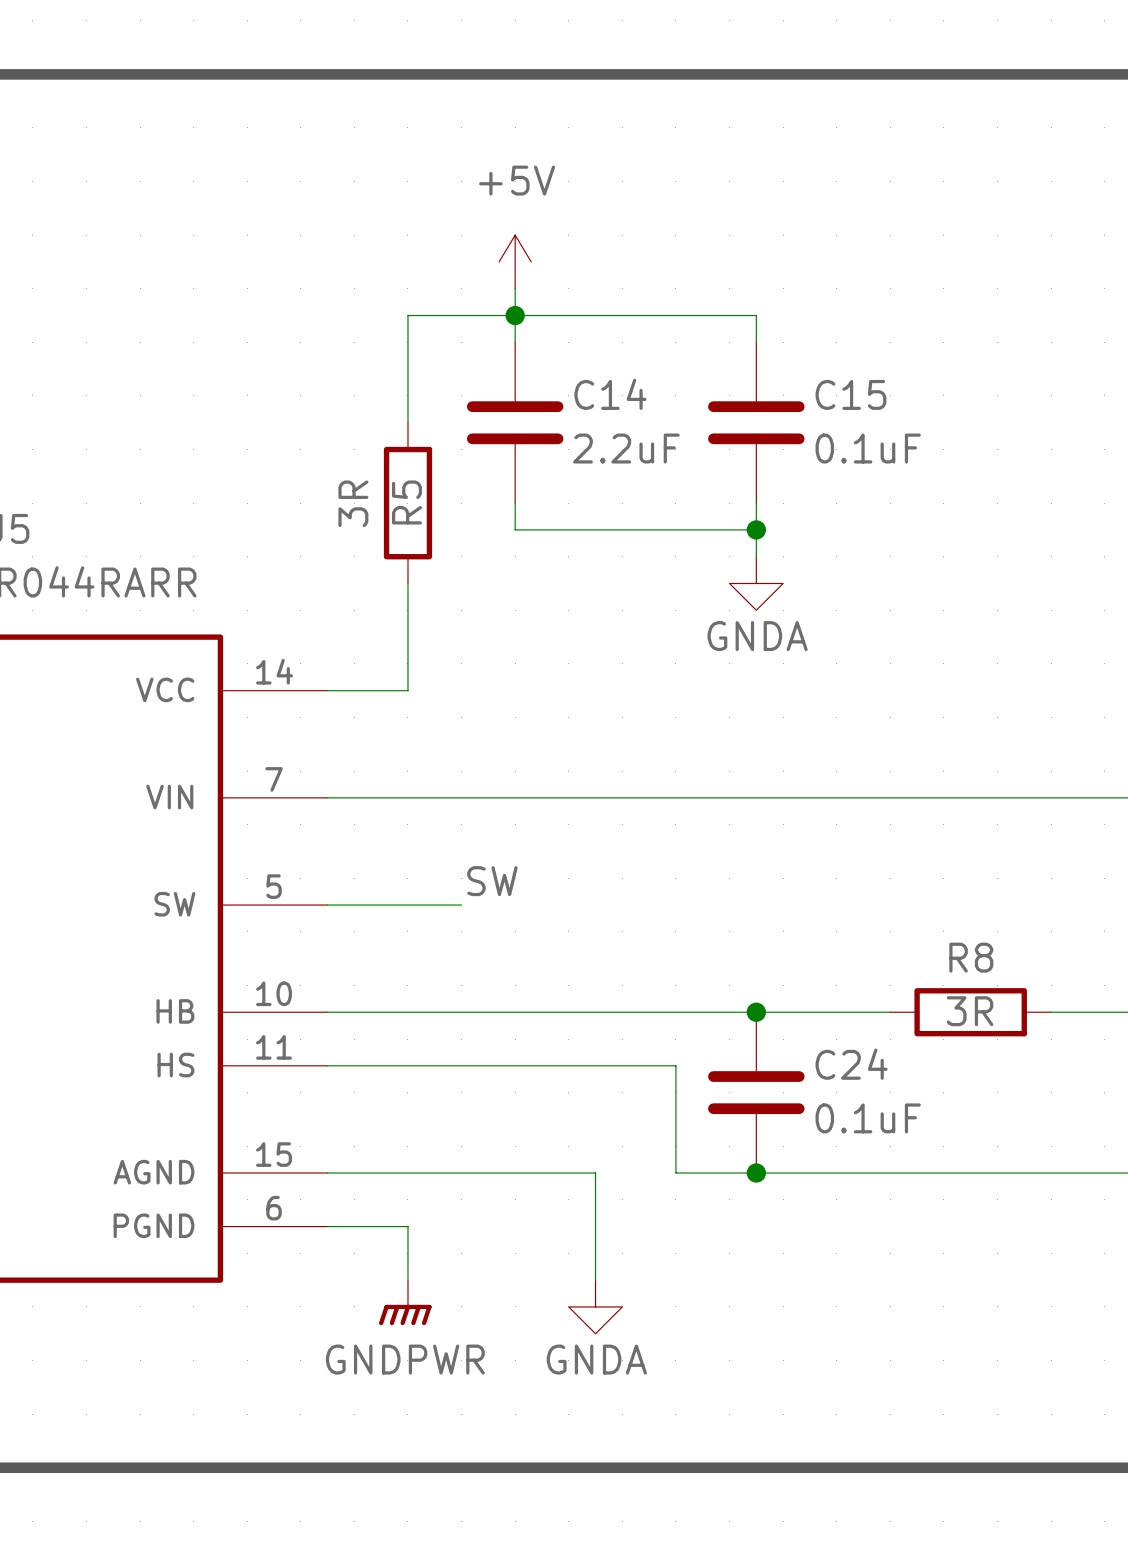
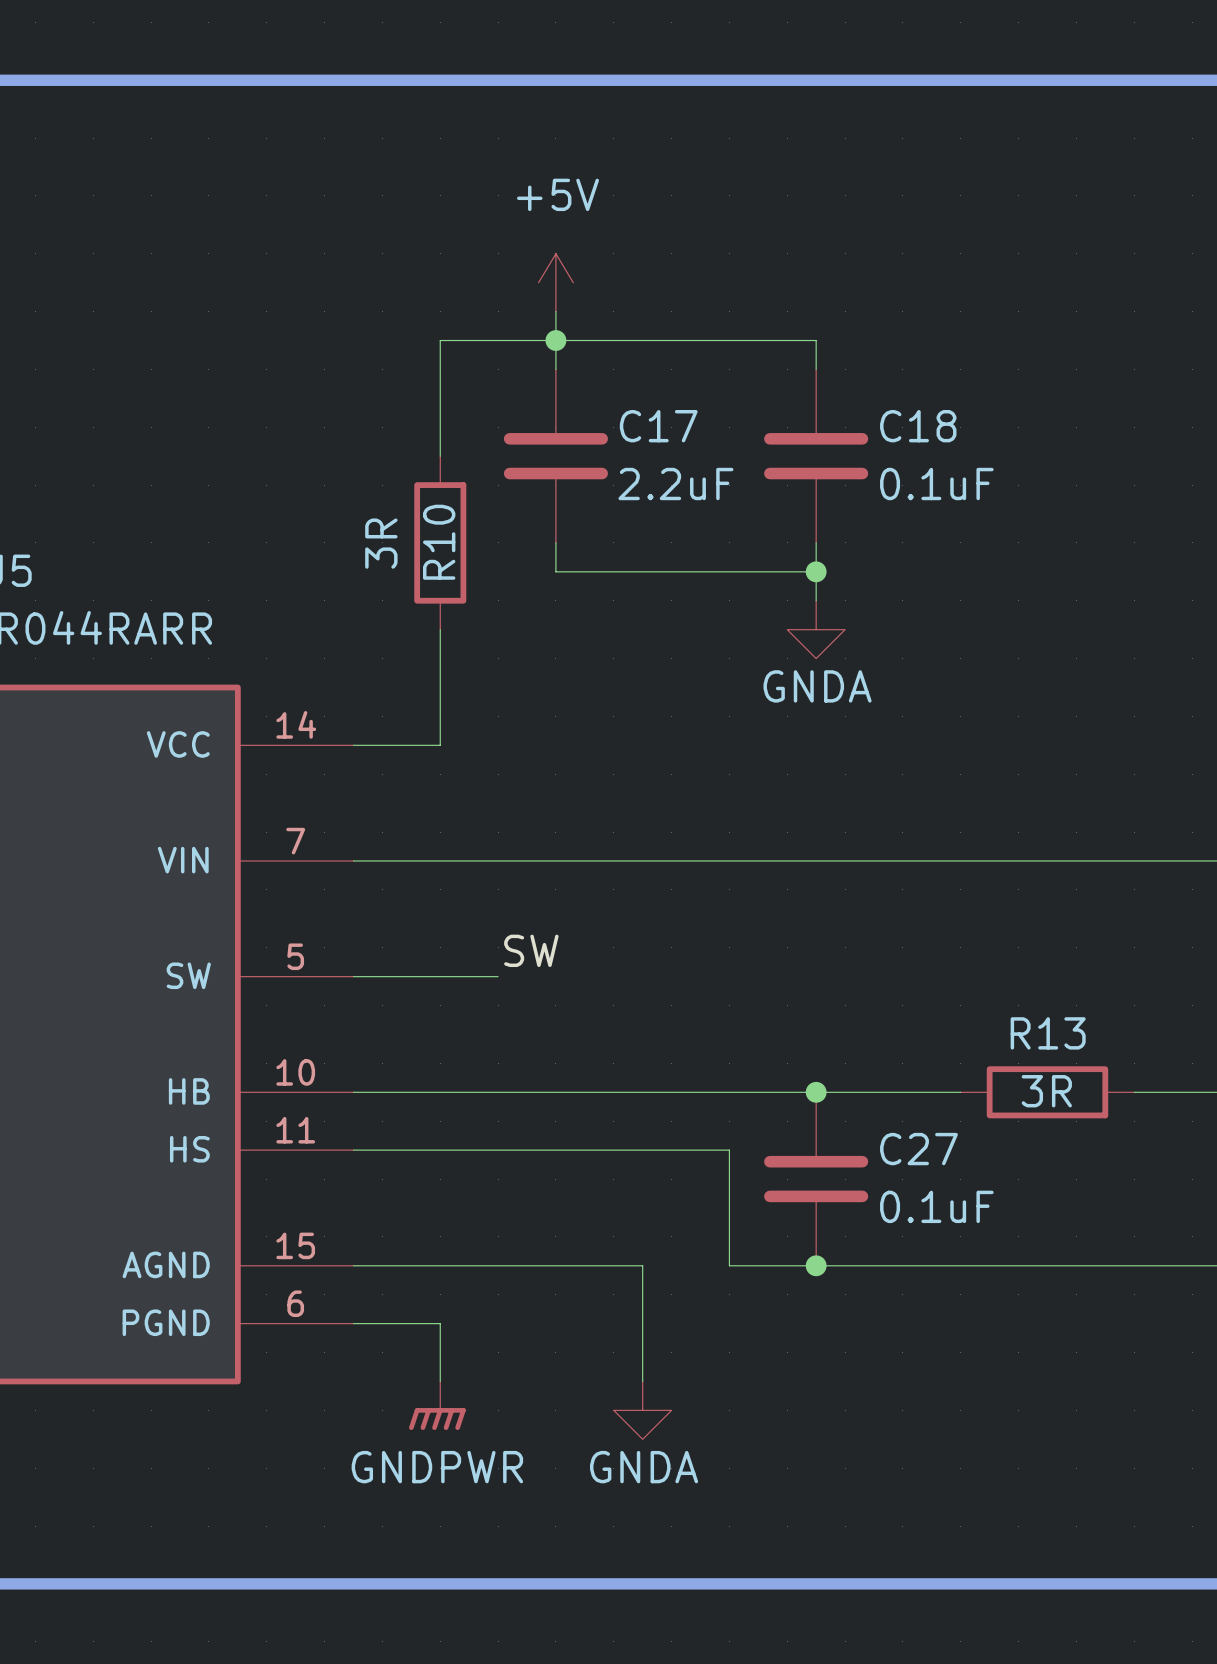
C14 name: C14 (610, 394) -> C17 (658, 426)
C15 name: C15 (850, 394) -> C18 (918, 426)
R5 name: R5 (406, 502) -> R10 (439, 542)
R8 name: R8 (971, 957) -> R13 (1048, 1033)
C24 name: C24 (851, 1064) -> C27 (918, 1149)

